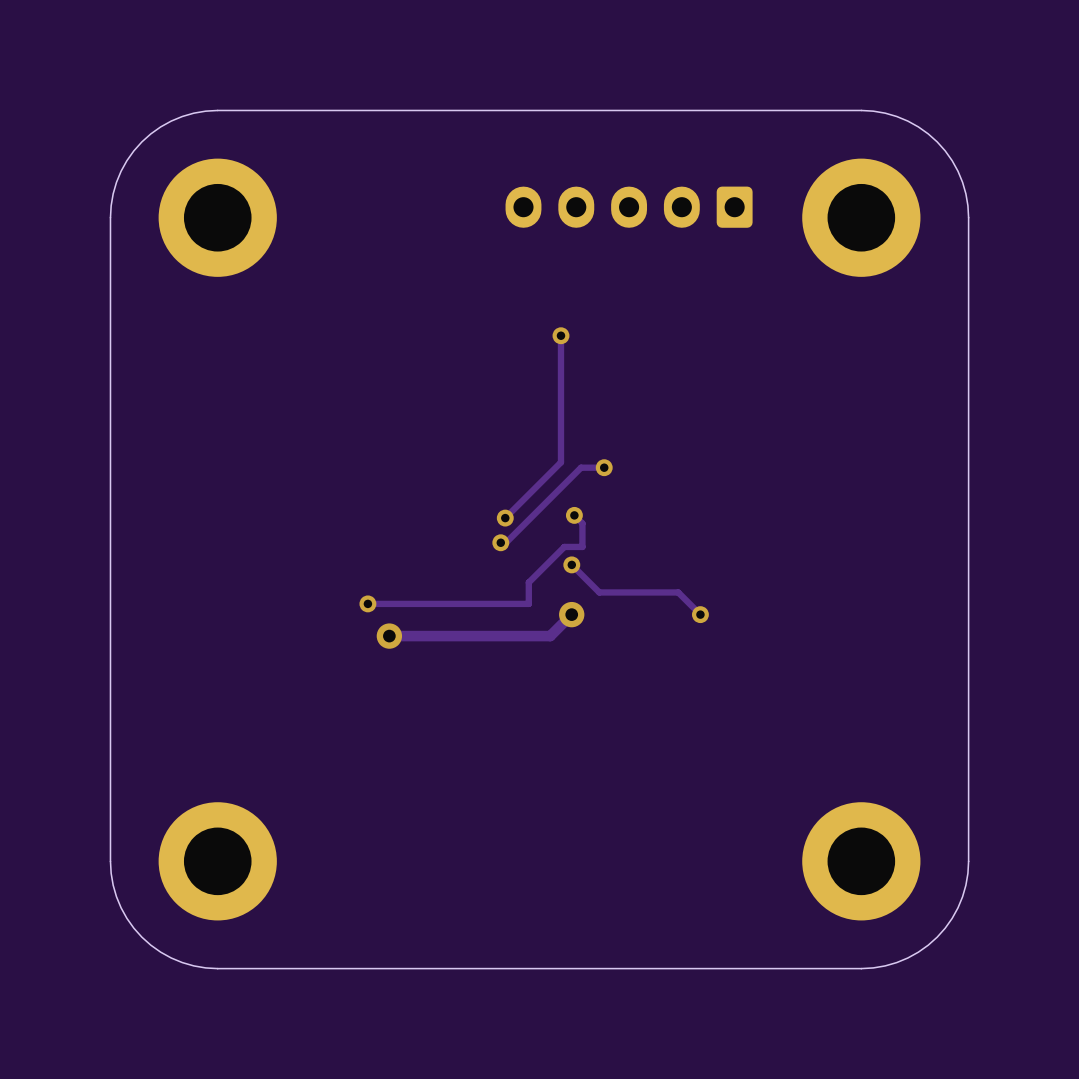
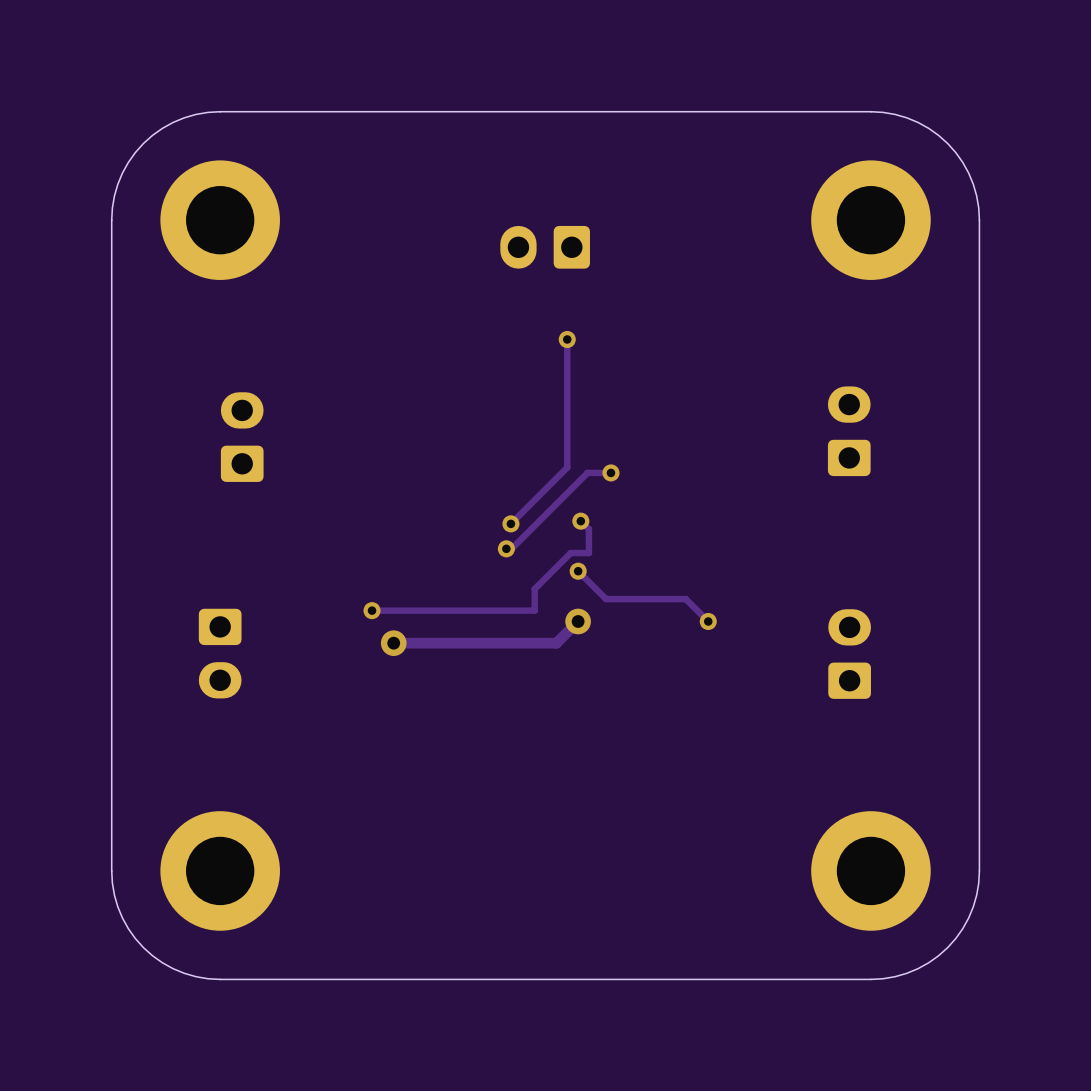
part: (629, 207) -> none
part: none -> (545, 247)
part: none -> (849, 431)
part: none -> (242, 437)
part: none -> (220, 653)
part: none -> (849, 654)

